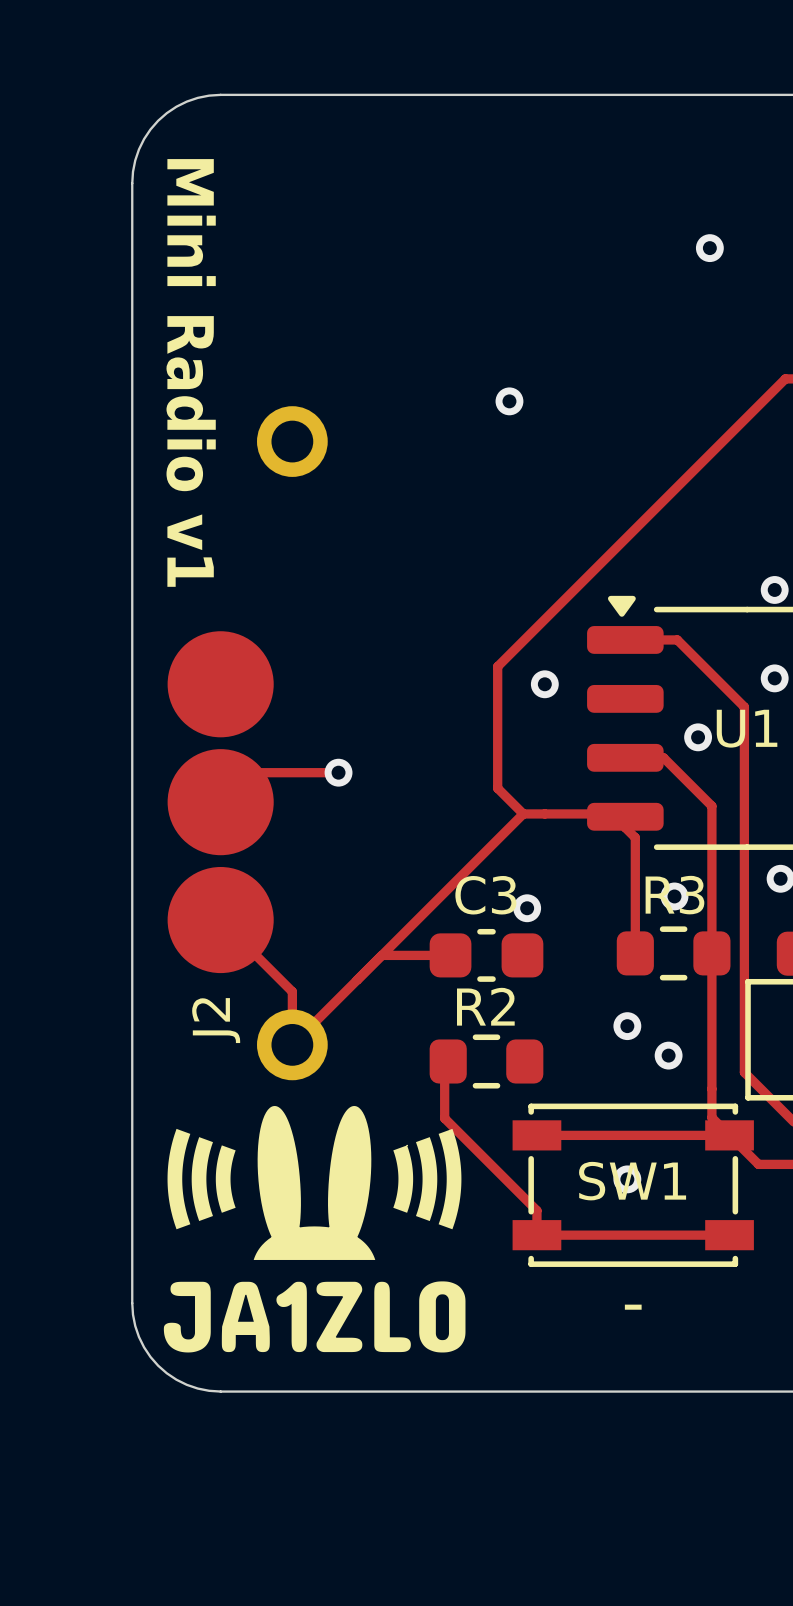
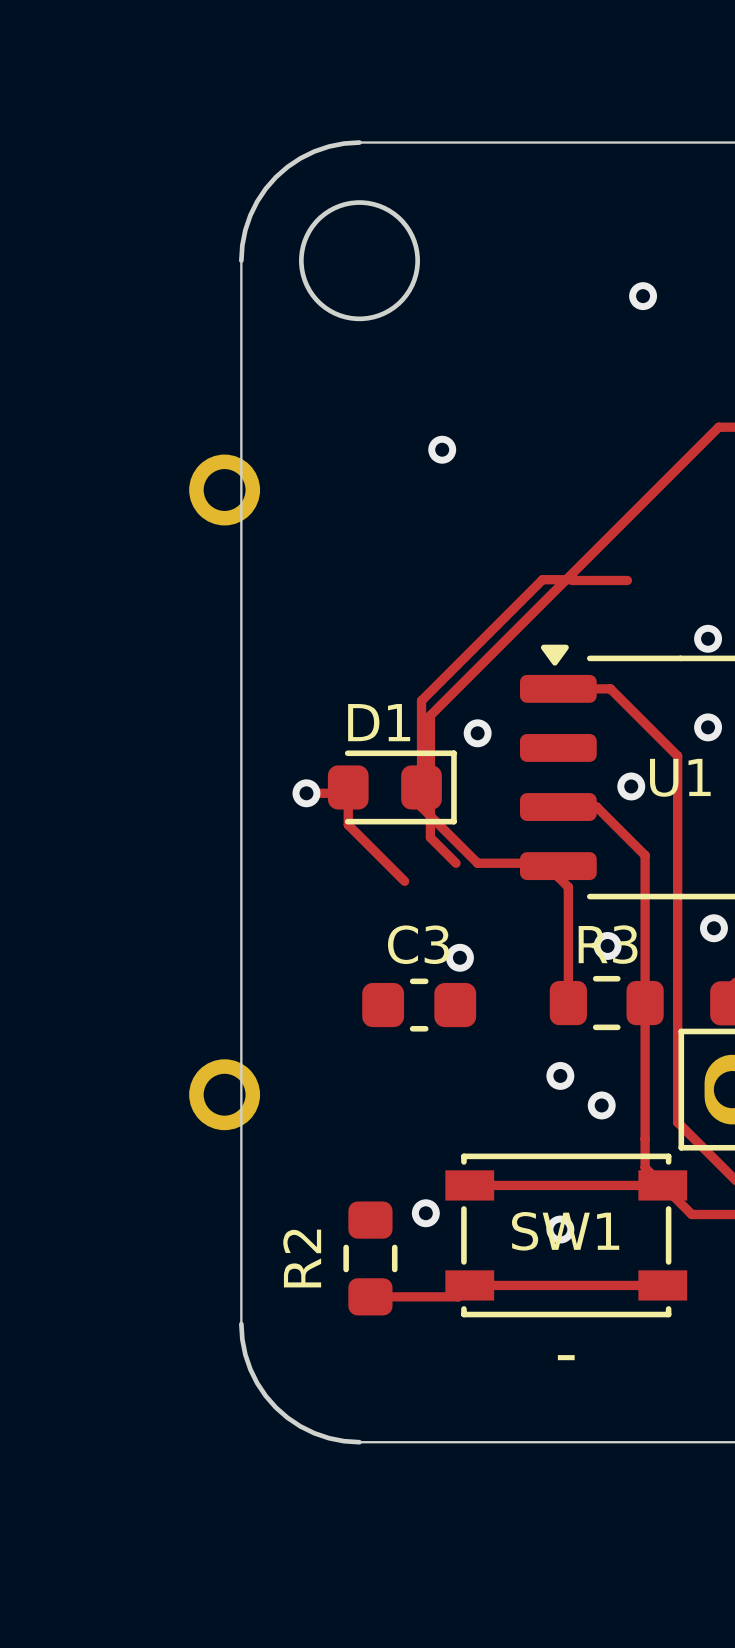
board edge: (426, 94) (220, 94) (197, 97) (176, 106) (166, 113) (150, 129) (144, 139) (135, 160) (132, 183) (132, 1303) (135, 1326) (144, 1347) (158, 1365) (176, 1379) (197, 1388) (220, 1391) (426, 1391) -> (359, 142) (328, 146) (314, 151) (287, 166) (275, 177) (257, 201) (250, 215) (242, 245) (241, 260) (242, 1339) (245, 1354) (257, 1383) (265, 1395) (287, 1417) (314, 1433) (328, 1438) (359, 1442)
round board edge: none -> [299, 200, 420, 322]
text: Mini Radio v1 (191, 372) -> none
D1: none -> (392, 787)
track: none -> (306, 793) (342, 793) (348, 787) (348, 824) (404, 881)
track: (338, 772) (250, 772) (220, 802) -> none
via position: (338, 772) -> (306, 793)
J2: (220, 802) -> none
track: (544, 813) (523, 813) (292, 1044) (292, 991) (220, 920) -> (477, 863) (421, 807) (421, 700) (542, 579) (627, 580)
track: (381, 955) (450, 955) -> none
track: (444, 1061) (444, 1118) (536, 1210) (536, 1235) -> (370, 1296) (458, 1296) (469, 1285)
R2 rotation: 0° (486, 1061) -> 90° clockwise (370, 1258)
R2 position: (486, 1061) -> (370, 1258)
drawing: [163, 1106, 466, 1353] -> none
via: none -> (425, 1213)

